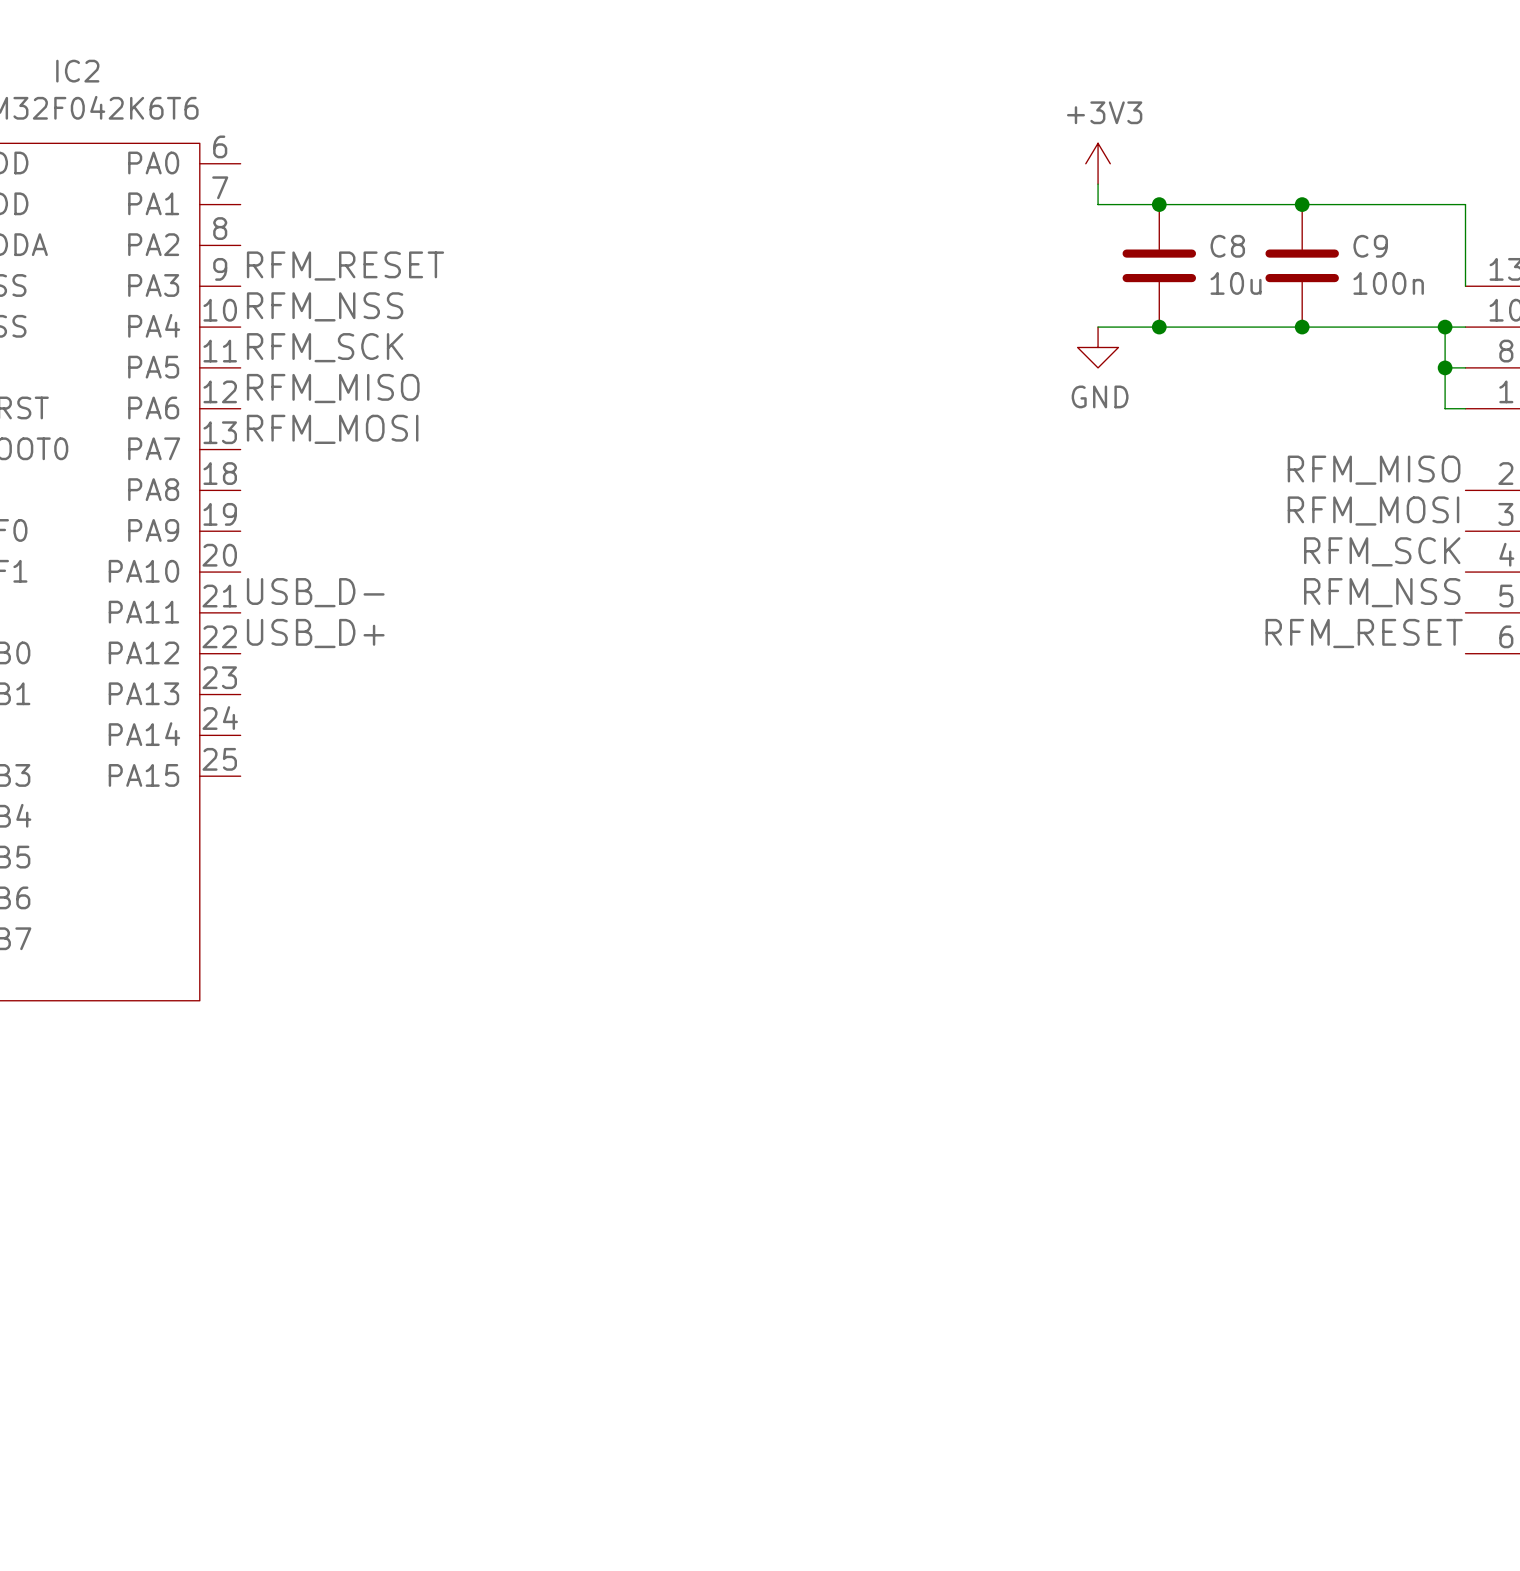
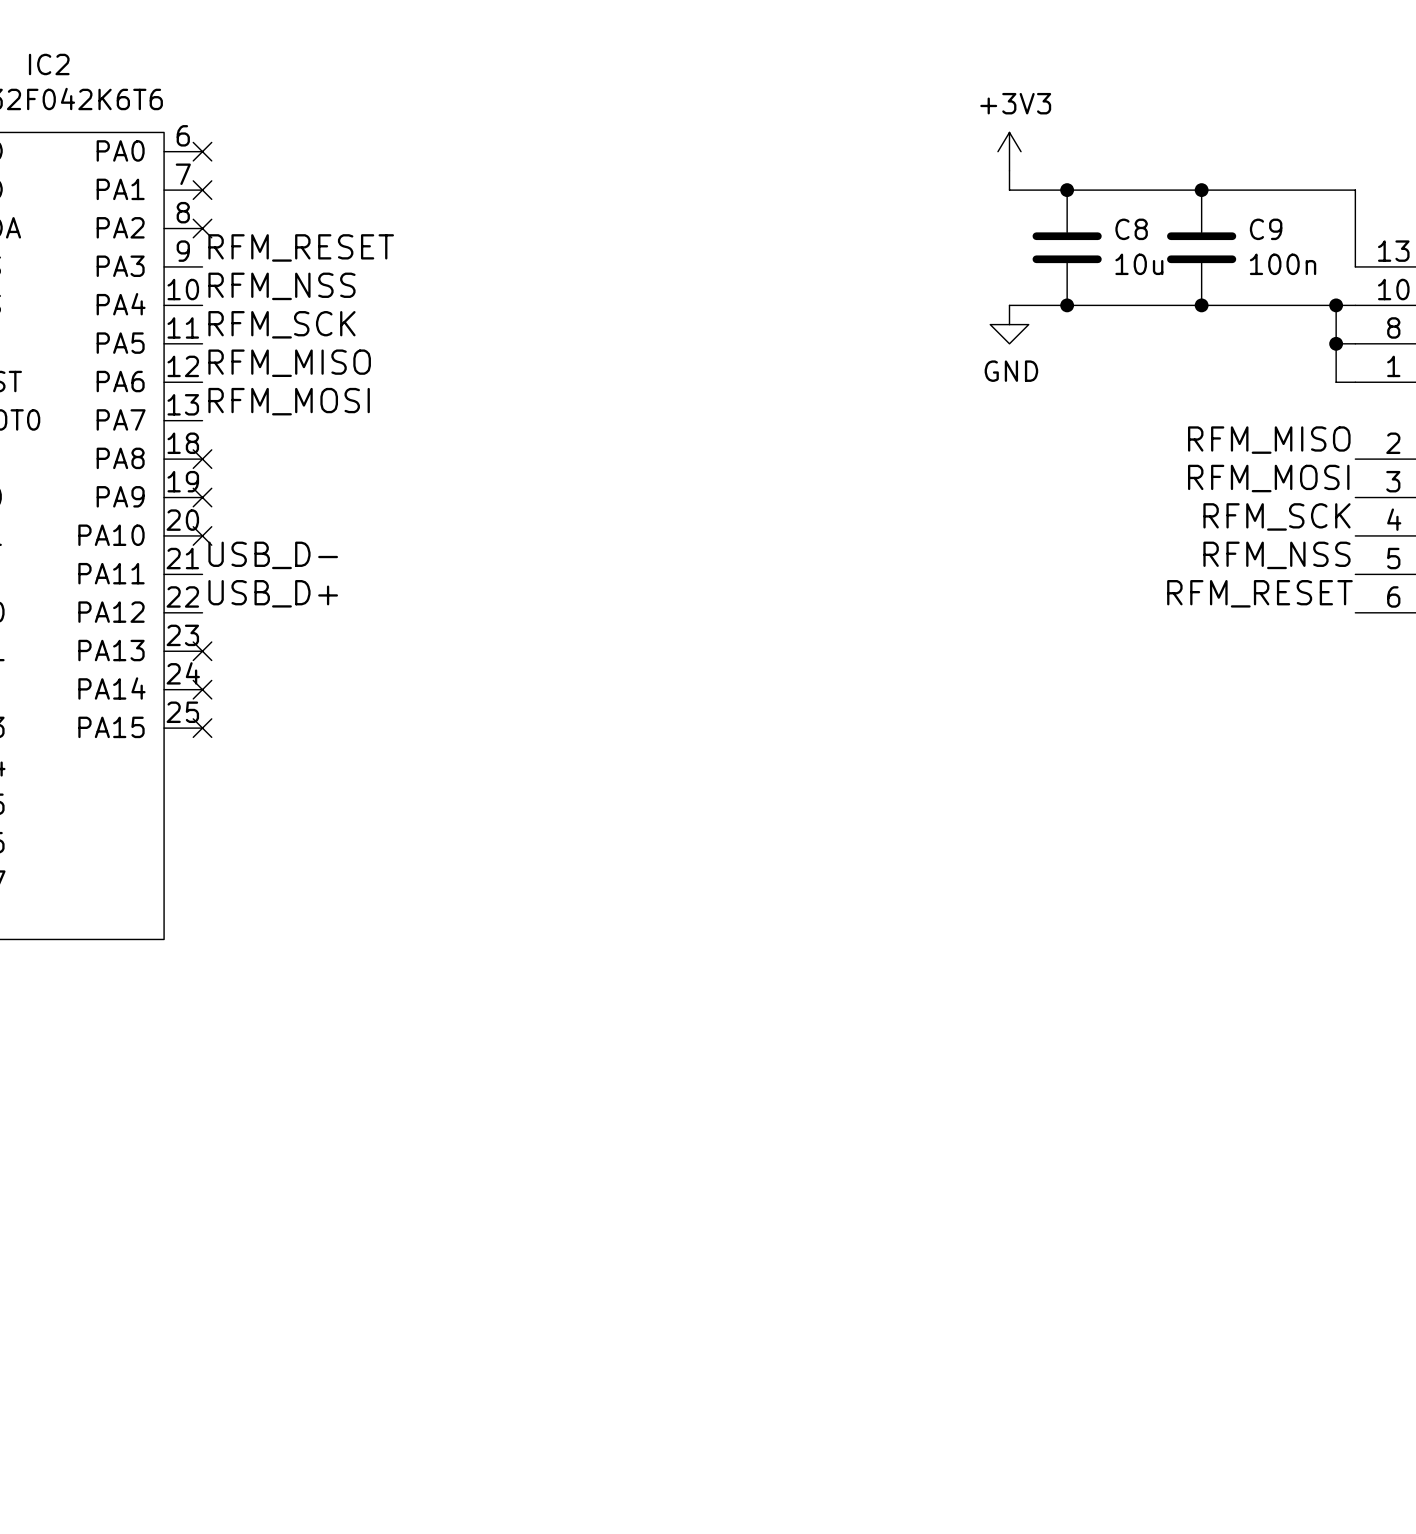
no-connect mark: none -> (202, 151)
no-connect mark: none -> (202, 190)
no-connect mark: none -> (202, 228)
no-connect mark: none -> (202, 459)
no-connect mark: none -> (202, 497)
no-connect mark: none -> (202, 535)
no-connect mark: none -> (202, 651)
no-connect mark: none -> (202, 689)
no-connect mark: none -> (202, 728)

